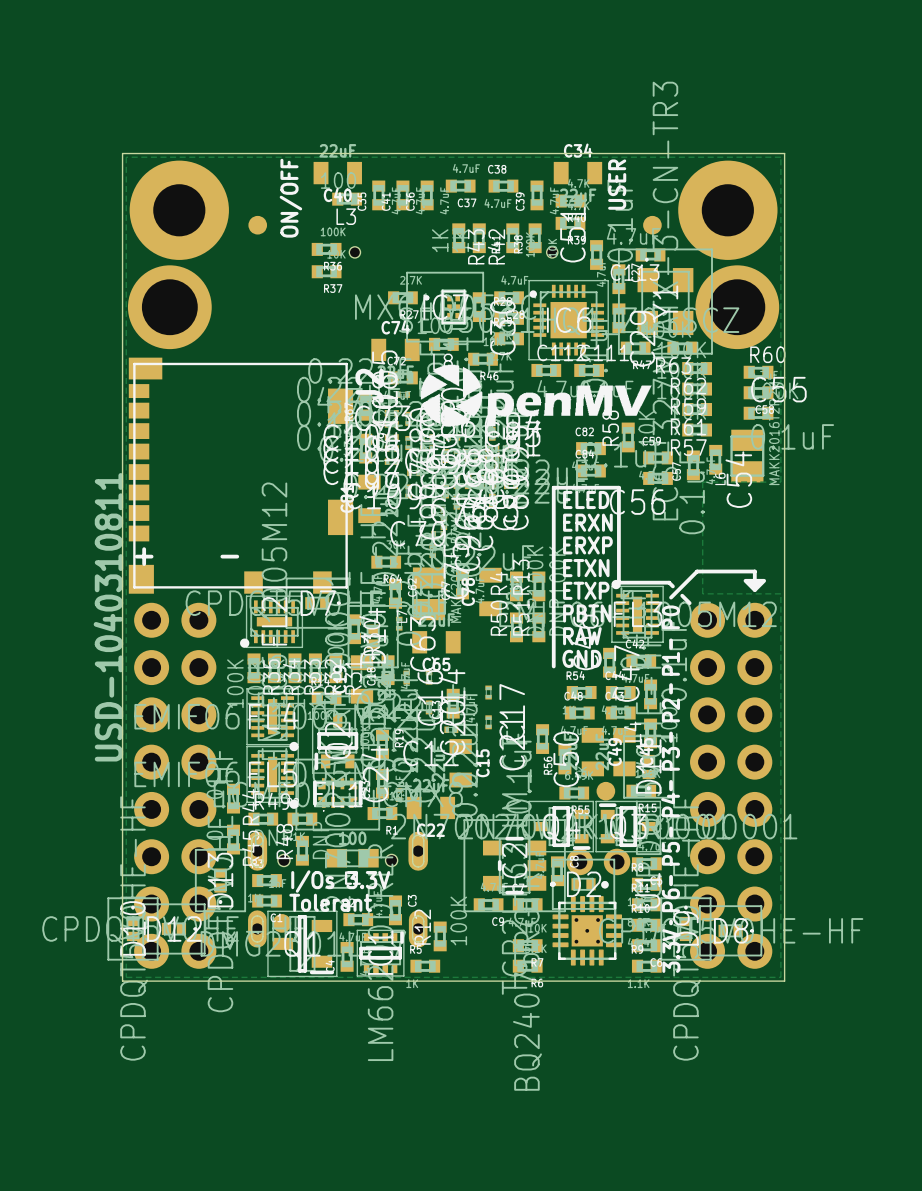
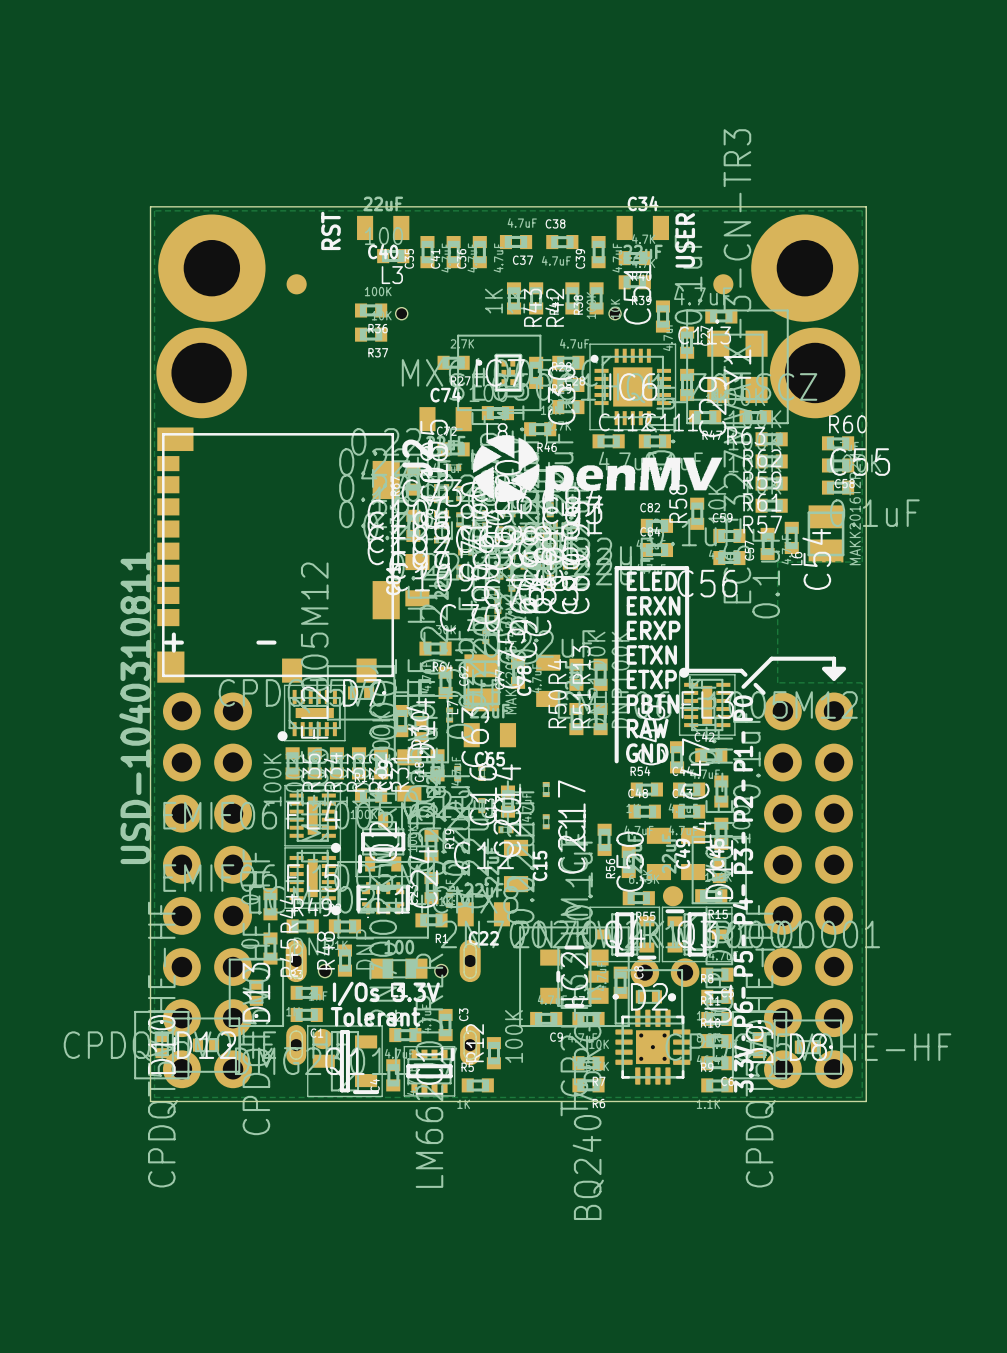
text: ON/OFF (290, 198) -> RST (330, 230)

